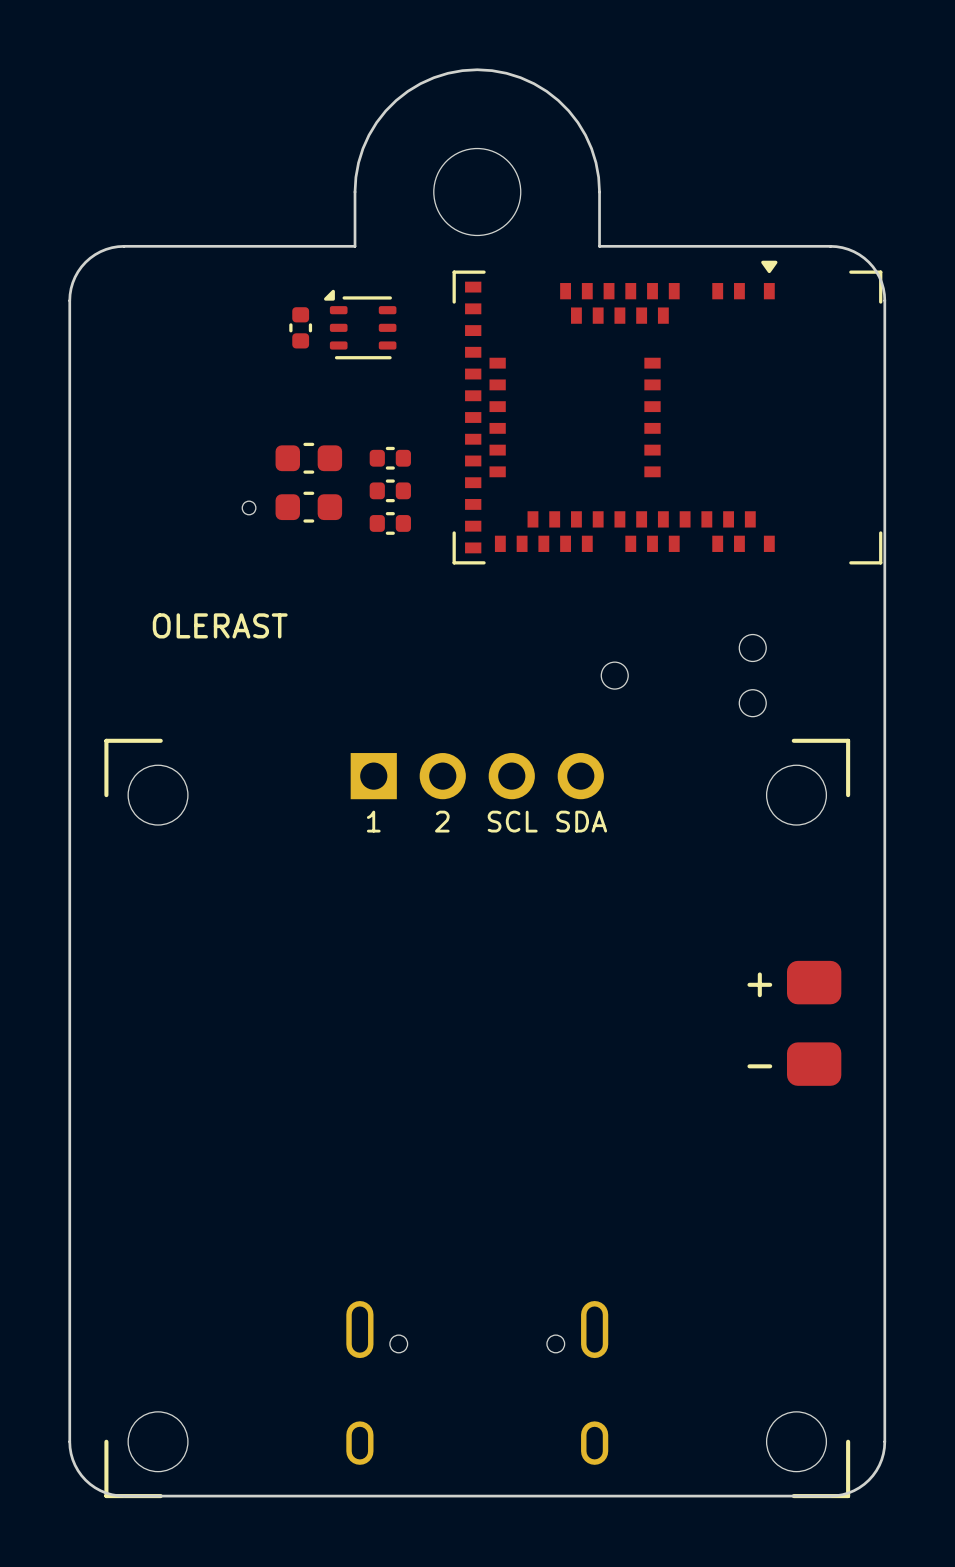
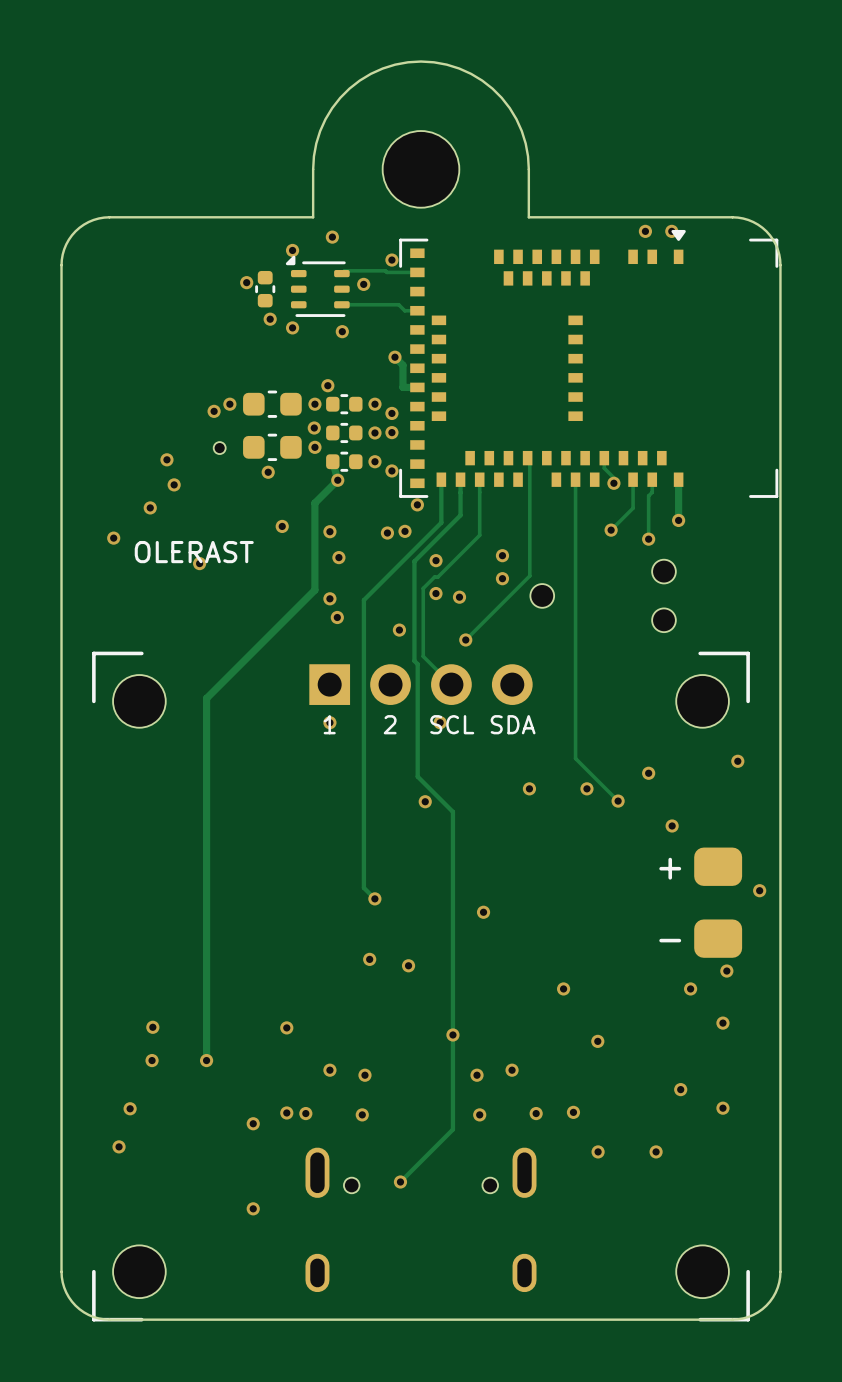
via: none -> (645, 231)
via: none -> (671, 231)
via: none -> (332, 237)
via: none -> (292, 250)
via: none -> (391, 260)
track: none -> (417, 272) (344, 270) (341, 273)
via: none -> (246, 282)
via: none -> (363, 284)
track: none -> (341, 304) (398, 304) (404, 310) (417, 310)
via: none -> (270, 319)
via: none -> (292, 327)
via: none -> (342, 331)
track: none -> (394, 357) (402, 365) (402, 387) (417, 387)
via: none -> (394, 357)
via: none -> (327, 385)
via: none -> (229, 404)
via: none -> (314, 404)
via: none -> (374, 404)
via: none -> (214, 411)
via: none -> (391, 413)
via: none -> (314, 428)
via: none -> (374, 432)
via: none -> (391, 432)
via: none -> (314, 447)
track: none -> (527, 458) (529, 460) (529, 575) (465, 639)
track: none -> (604, 458) (604, 468) (613, 477) (613, 483)
via: none -> (166, 459)
track: none -> (332, 461) (337, 480) (314, 503) (314, 590) (206, 698) (206, 1060)
via: none -> (374, 461)
via: none -> (391, 470)
via: none -> (268, 472)
track: none -> (441, 479) (441, 522) (363, 600) (363, 887) (374, 898)
track: none -> (460, 479) (460, 515) (414, 561) (414, 660) (417, 664) (417, 776) (452, 811) (452, 1129) (400, 1181)
track: none -> (479, 479) (479, 535) (437, 577) (434, 577) (423, 588) (423, 656) (451, 684)
track: none -> (575, 479) (575, 758) (618, 801)
track: none -> (633, 479) (633, 508) (611, 530)
track: none -> (652, 479) (652, 492) (648, 495) (648, 539)
track: none -> (678, 479) (678, 520)
via: none -> (337, 480)
via: none -> (613, 483)
via: none -> (174, 484)
via: none -> (417, 504)
via: none -> (150, 507)
via: none -> (678, 520)
via: none -> (282, 526)
via: none -> (611, 530)
via: none -> (329, 531)
via: none -> (405, 531)
via: none -> (387, 533)
via: none -> (113, 538)
via: none -> (648, 539)
via: none -> (502, 555)
via: none -> (338, 557)
via: none -> (436, 560)
via: none -> (199, 563)
via: none -> (502, 578)
via: none -> (435, 593)
via: none -> (459, 597)
via: none -> (329, 598)
via: none -> (337, 617)
via: none -> (399, 630)
via: none -> (465, 639)
via: none -> (329, 722)
via: none -> (440, 722)
via: none -> (737, 761)
via: none -> (648, 773)
via: none -> (529, 788)
via: none -> (586, 788)
via: none -> (425, 801)
via: none -> (618, 801)
via: none -> (672, 825)
via: none -> (759, 890)
via: none -> (374, 898)
via: none -> (483, 912)
via: none -> (369, 959)
via: none -> (408, 965)
via: none -> (726, 971)
via: none -> (563, 988)
via: none -> (690, 988)
via: none -> (722, 1023)
via: none -> (152, 1027)
via: none -> (286, 1027)
via: none -> (452, 1034)
via: none -> (597, 1041)
via: none -> (152, 1060)
via: none -> (206, 1060)
via: none -> (329, 1070)
via: none -> (512, 1070)
via: none -> (364, 1075)
via: none -> (477, 1075)
via: none -> (680, 1089)
via: none -> (722, 1108)
via: none -> (130, 1108)
via: none -> (286, 1112)
via: none -> (573, 1112)
via: none -> (305, 1113)
via: none -> (536, 1113)
via: none -> (362, 1114)
via: none -> (479, 1114)
via: none -> (253, 1123)
via: none -> (119, 1146)
via: none -> (598, 1151)
via: none -> (656, 1151)
via: none -> (400, 1181)
via: none -> (253, 1208)

